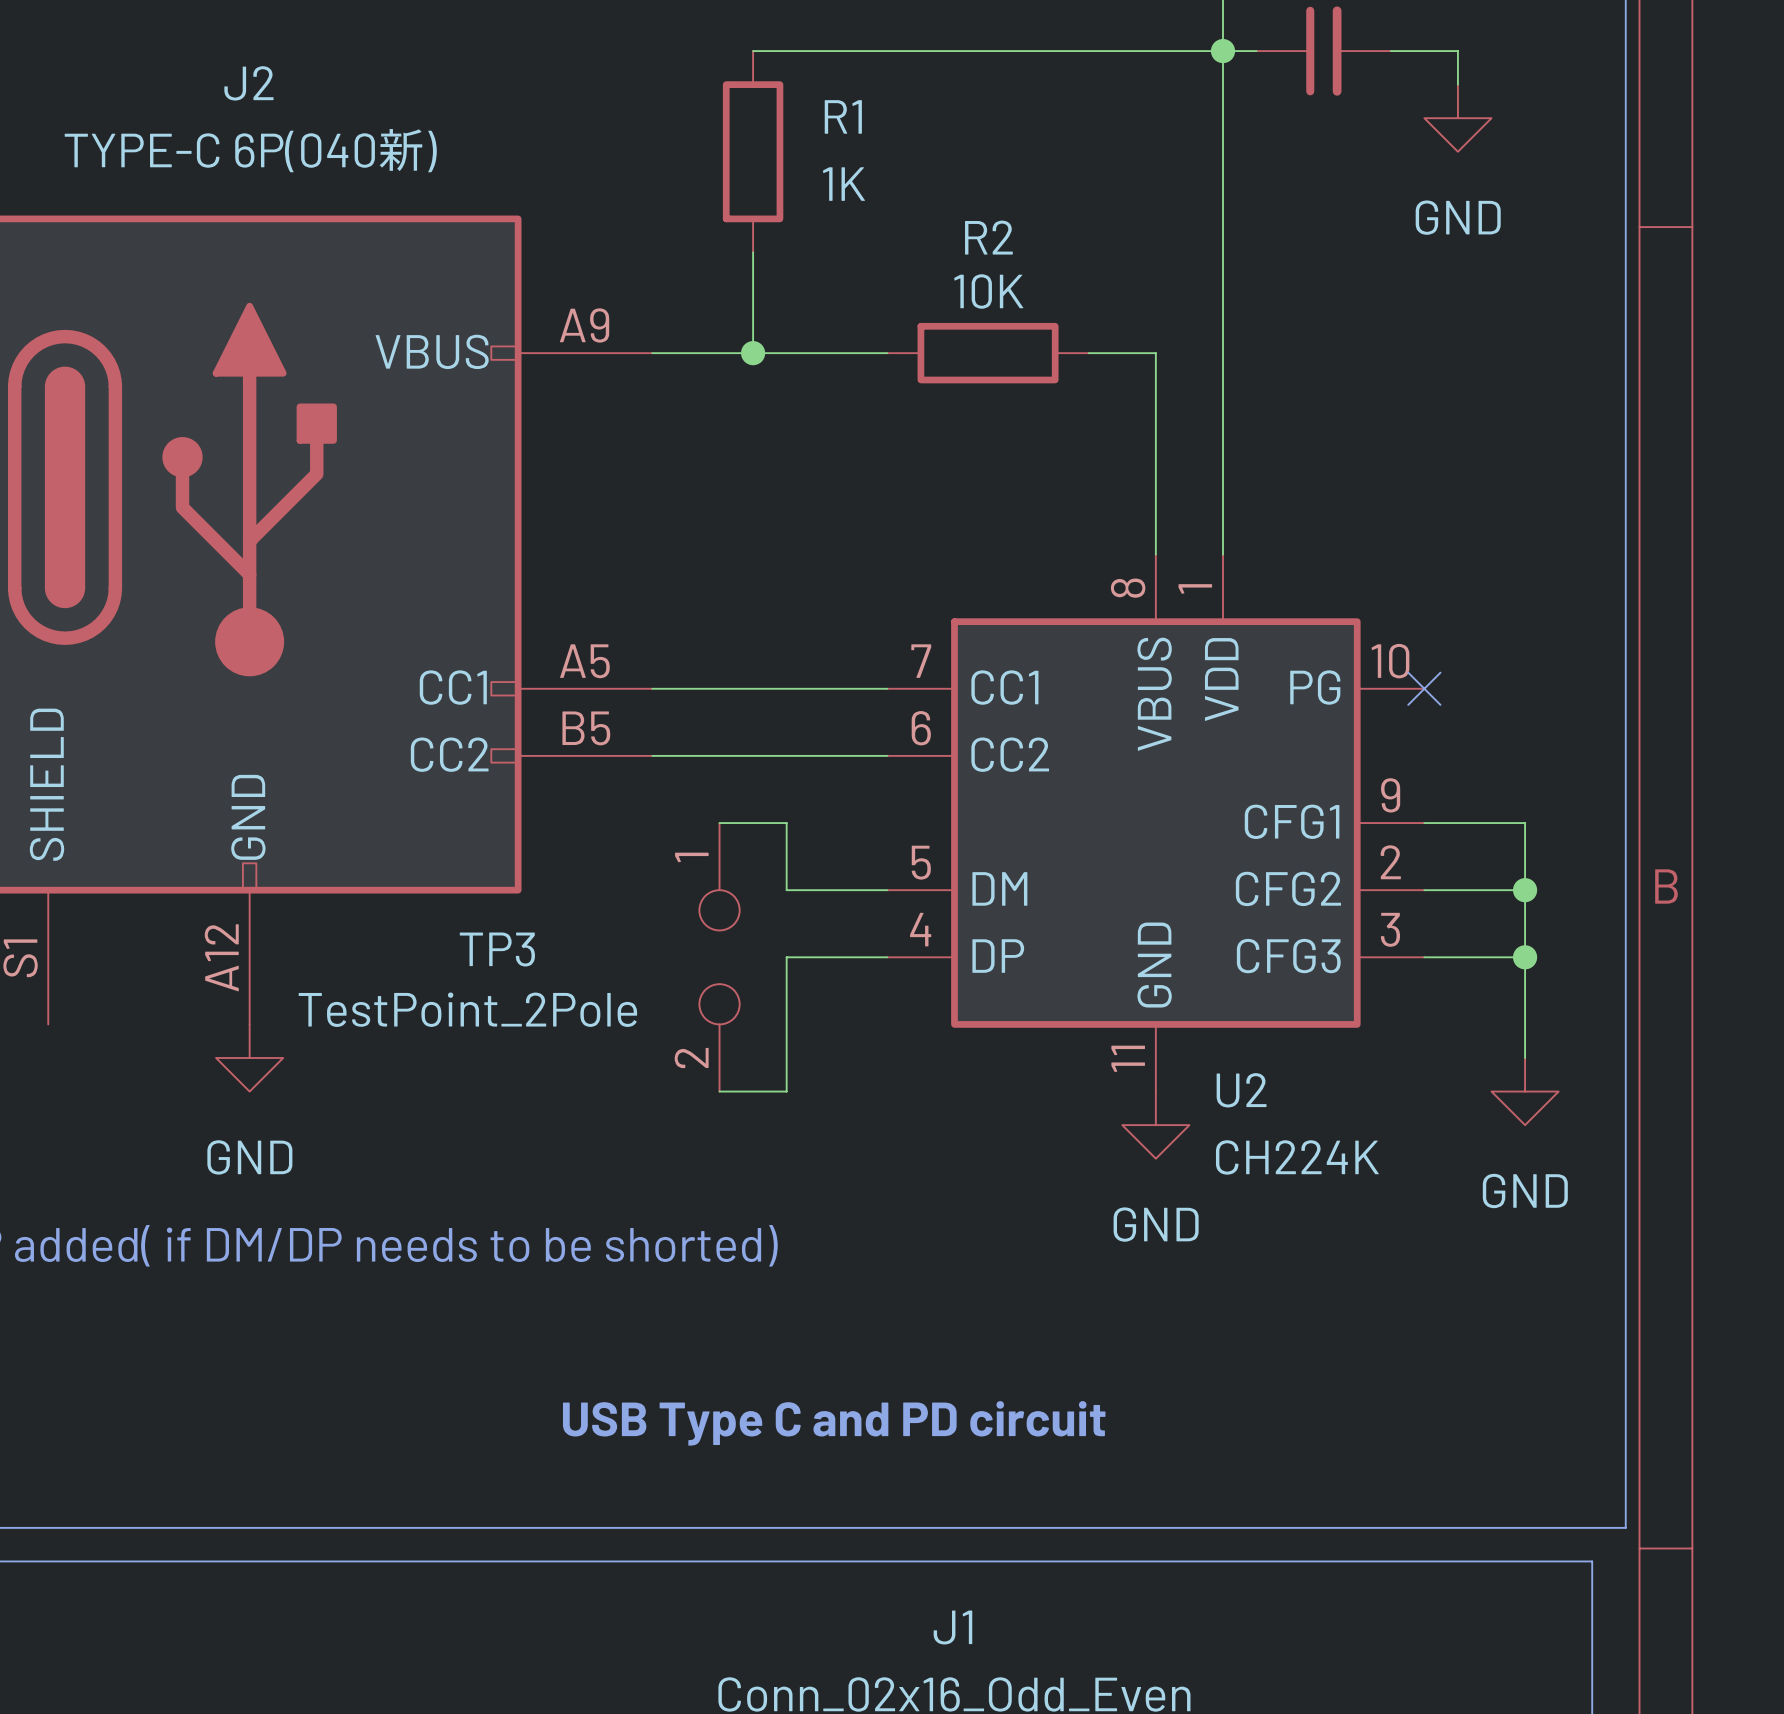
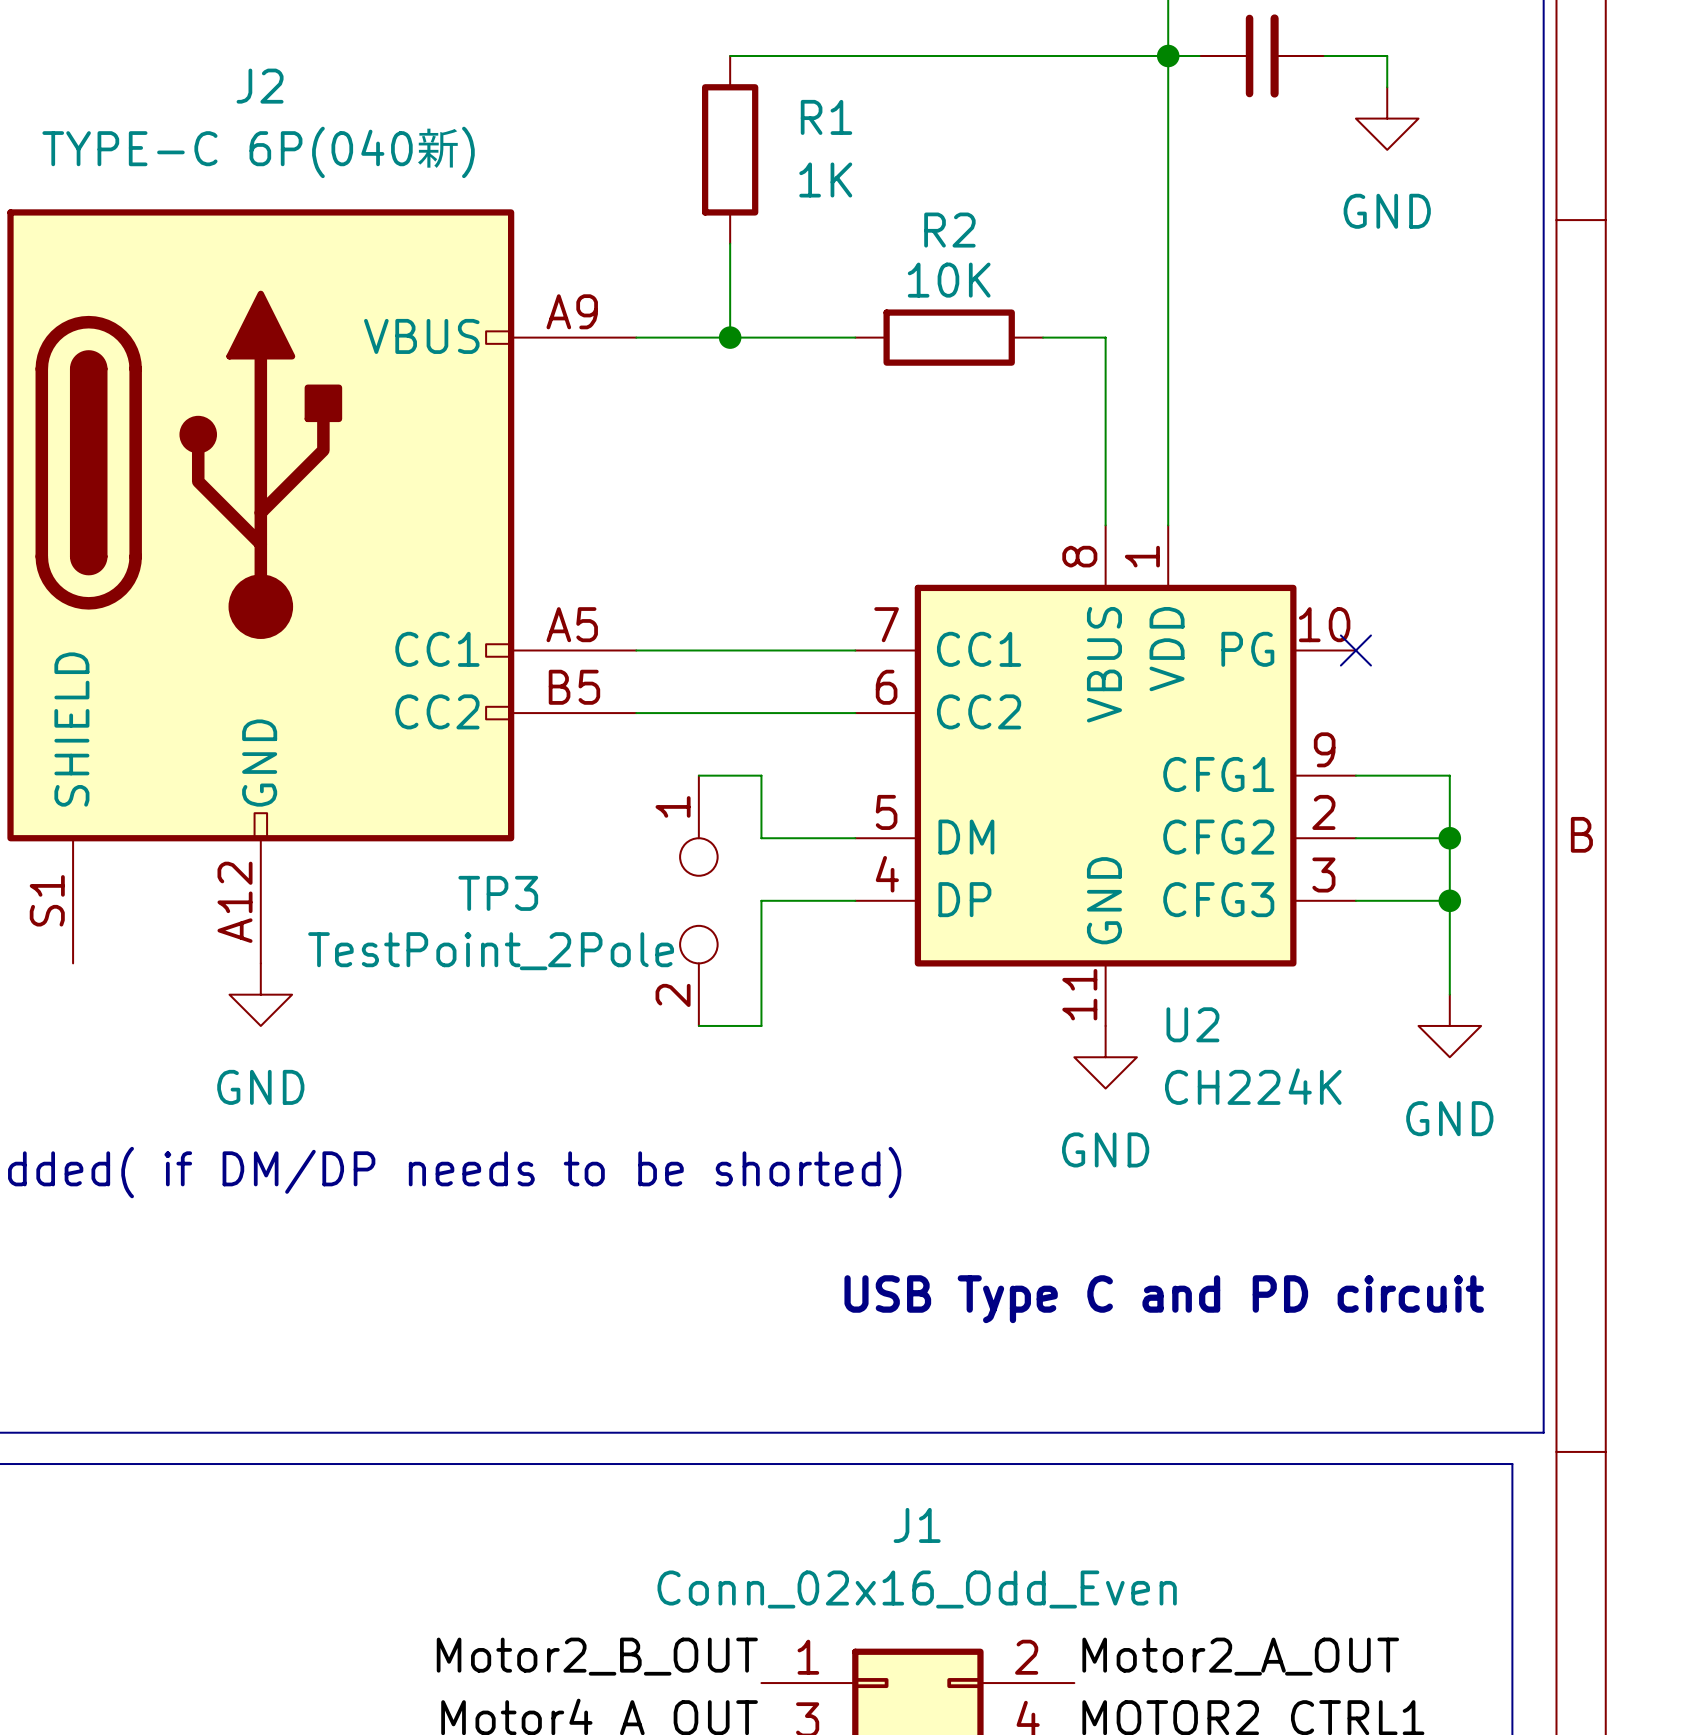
text position: USB Type C and PD circuit (834, 1423) -> USB Type C and PD circuit (1164, 1299)

